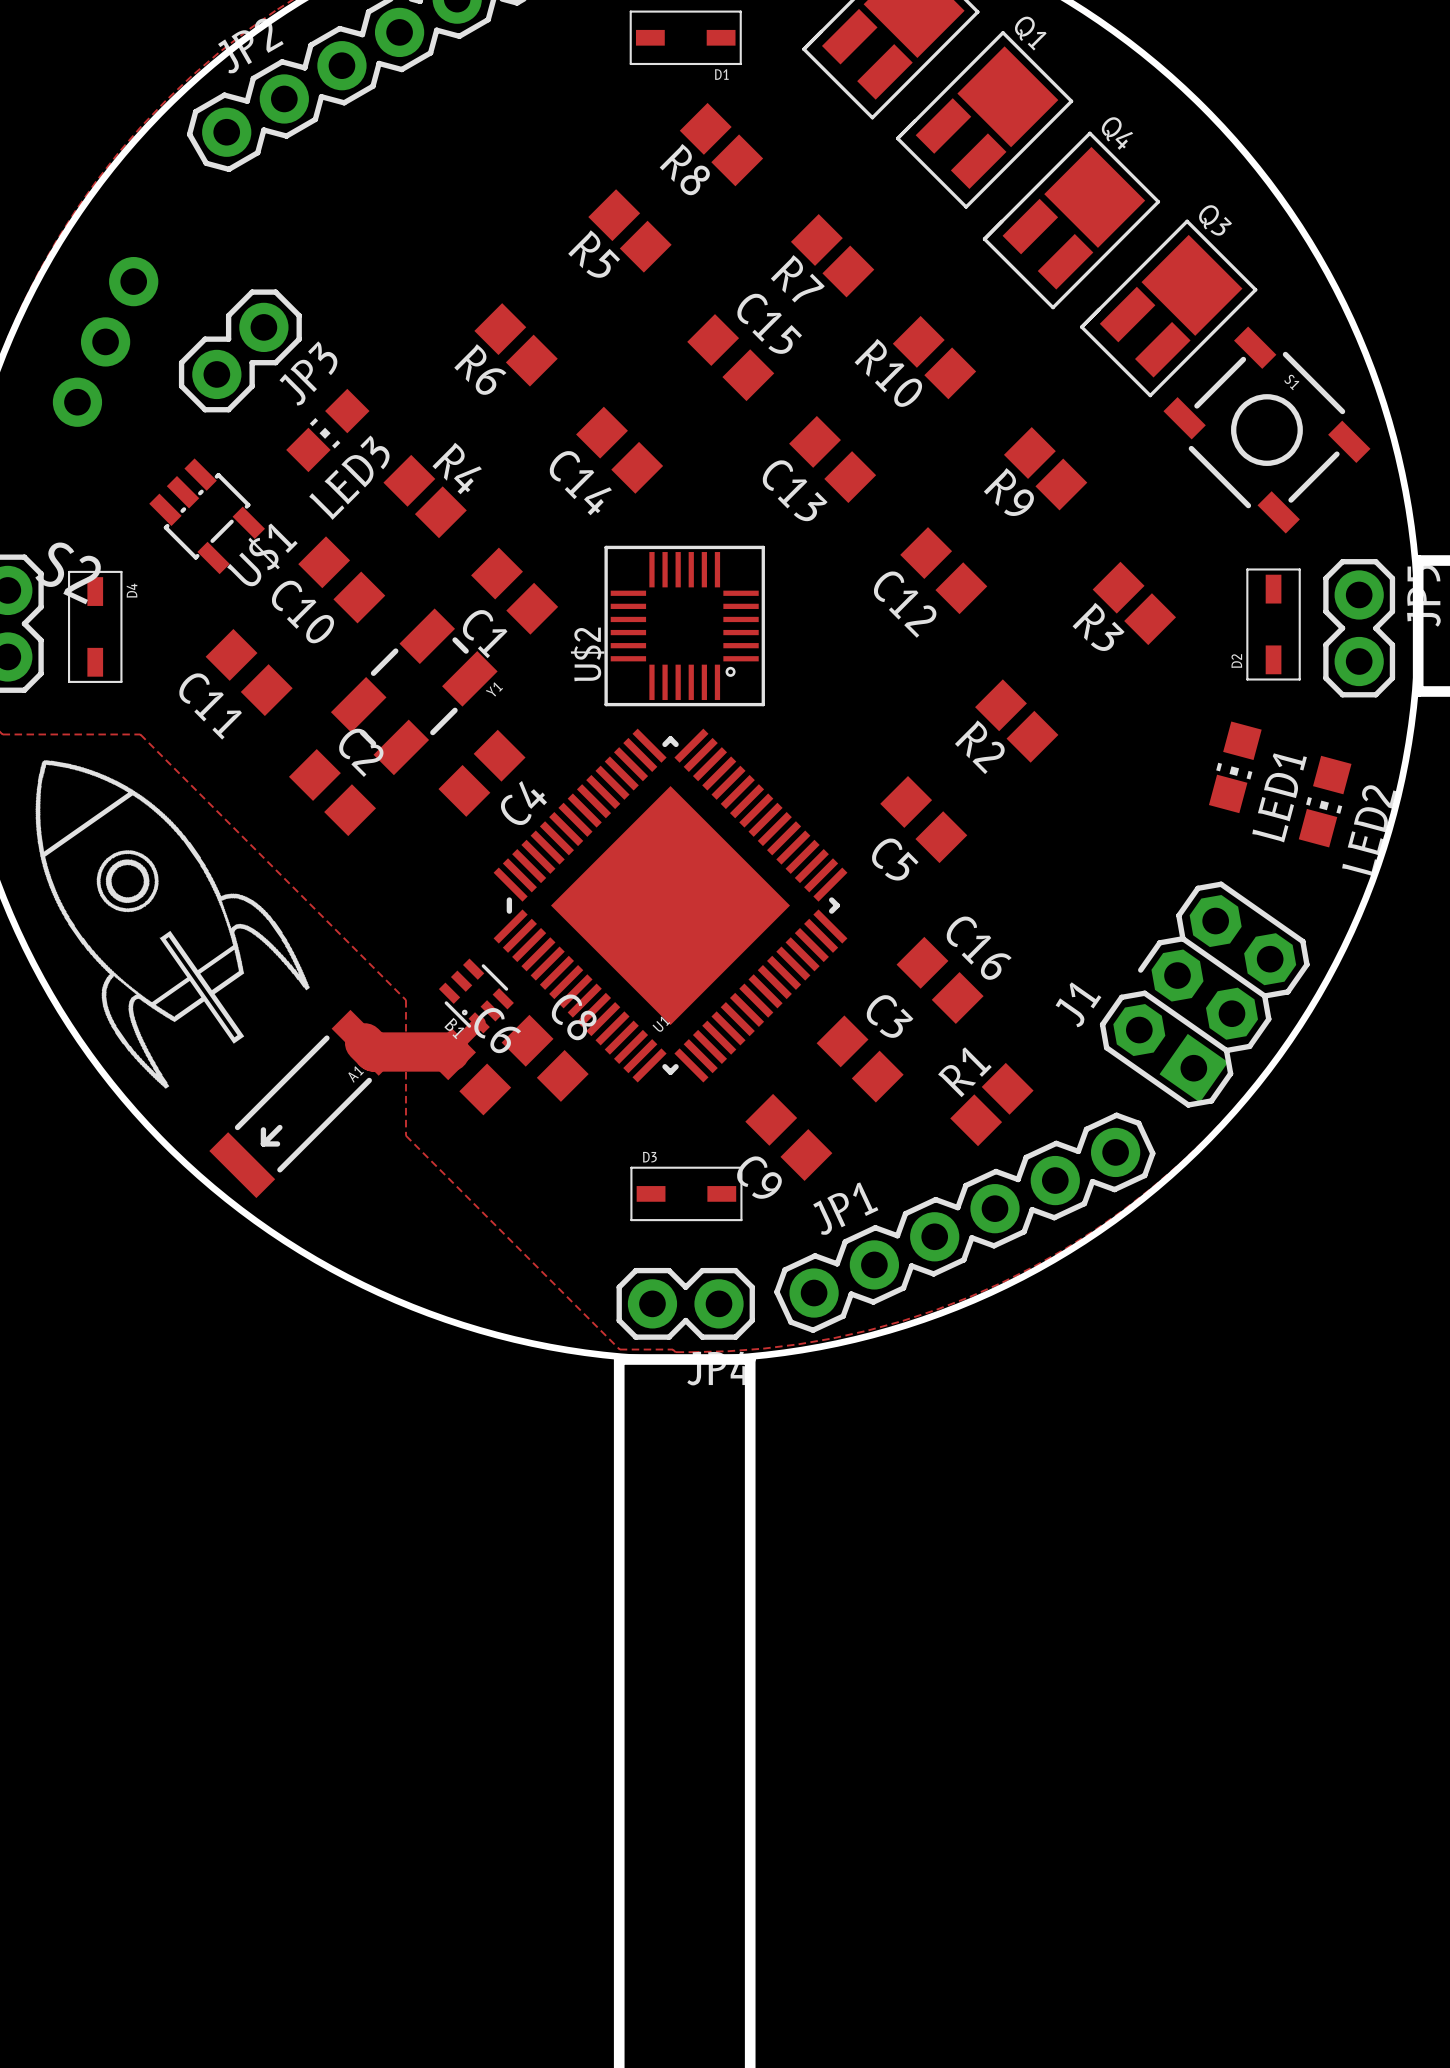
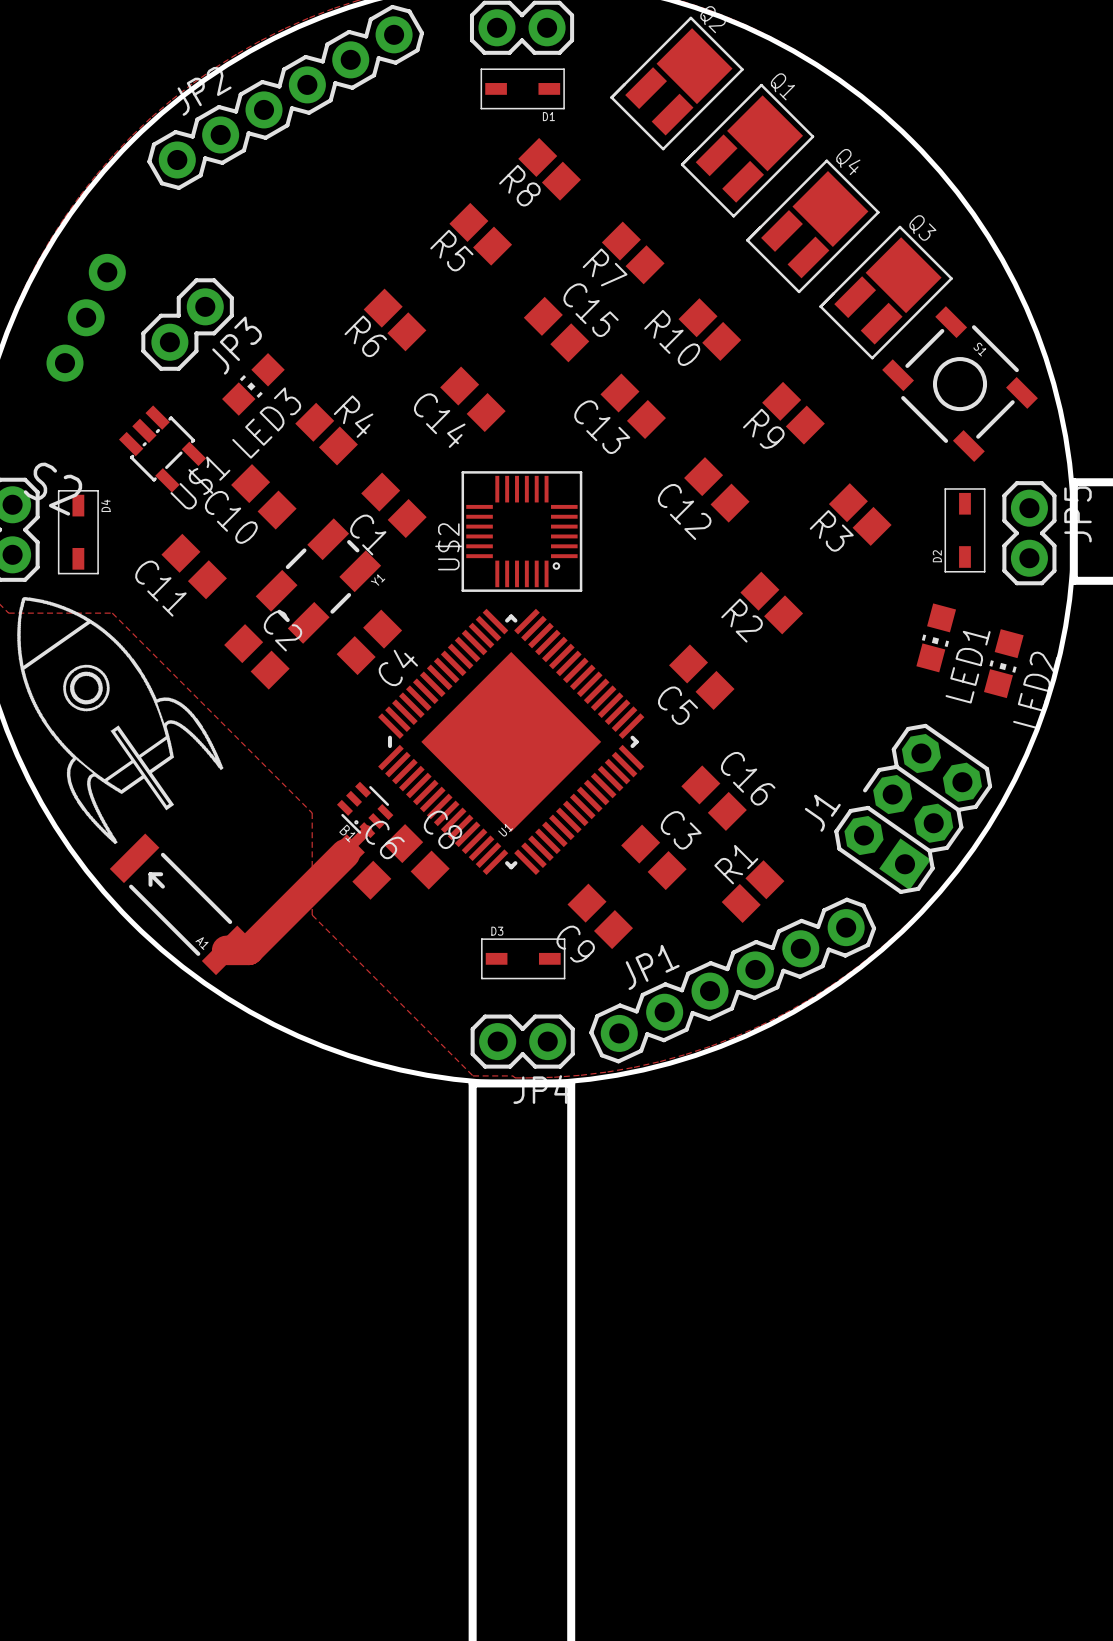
drawing position: (172, 924) -> (120, 720)
track: (364, 1042) (373, 1052) (450, 1052) -> none
track: none -> (345, 853) (248, 950) (226, 950)
A1 rotation: 0° (303, 1103) -> 90° clockwise (180, 904)

